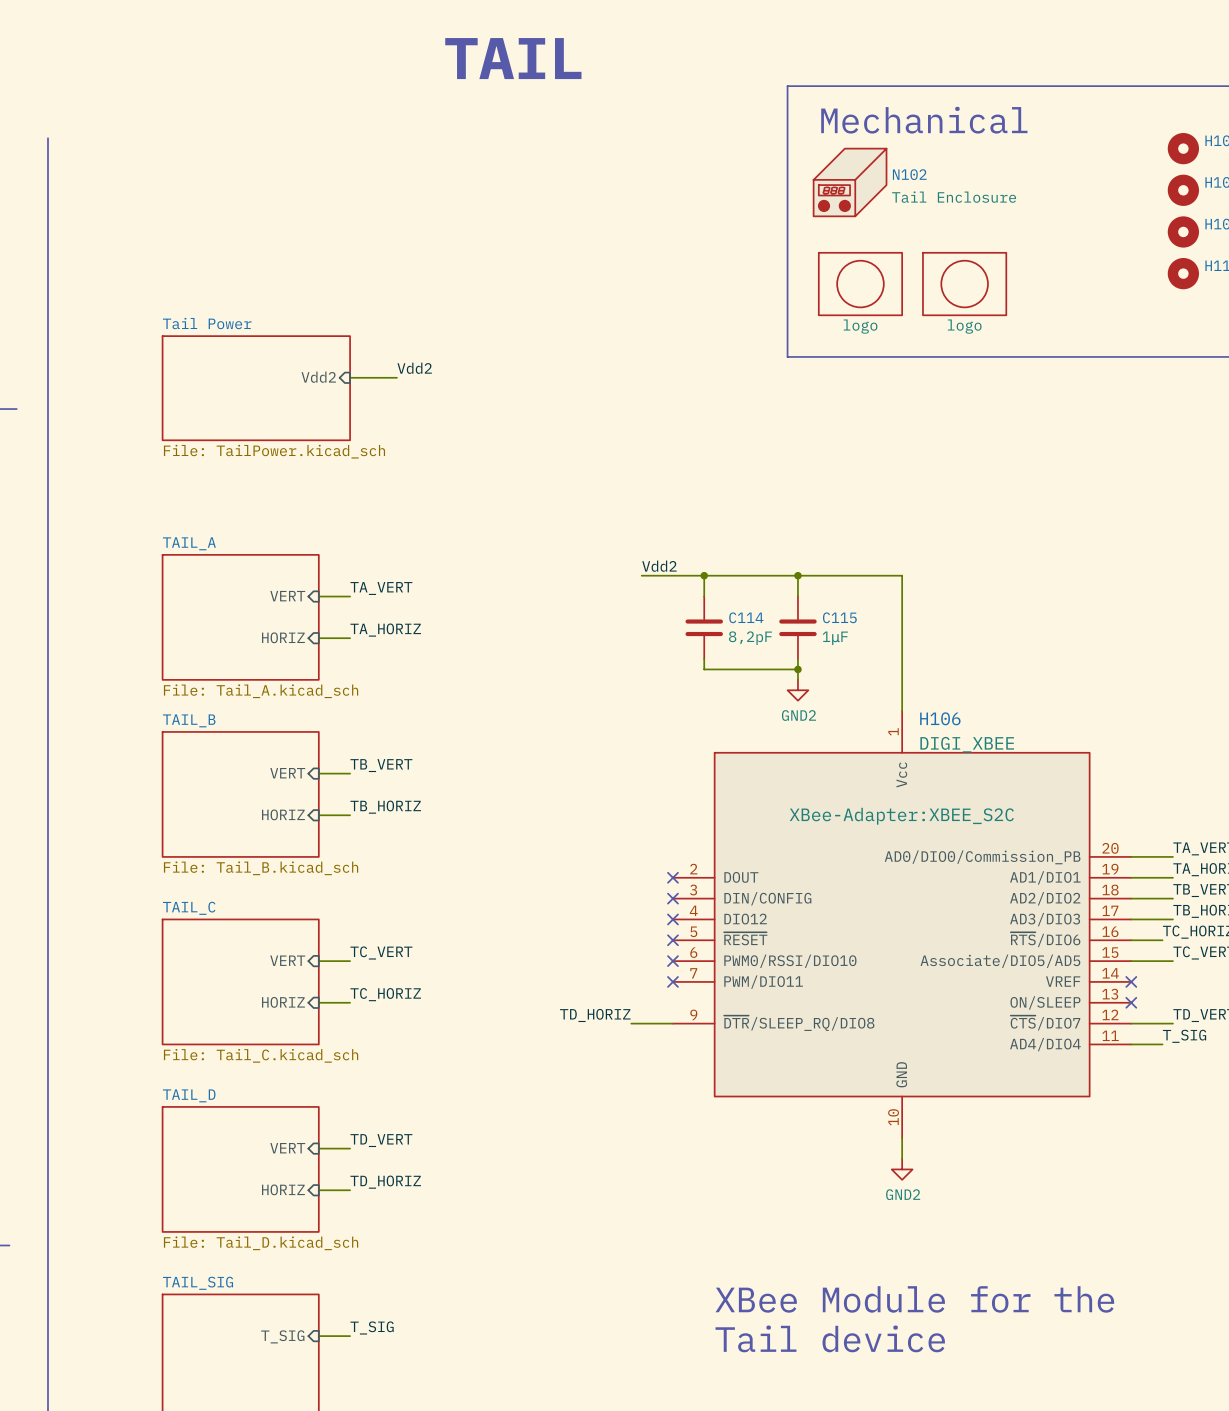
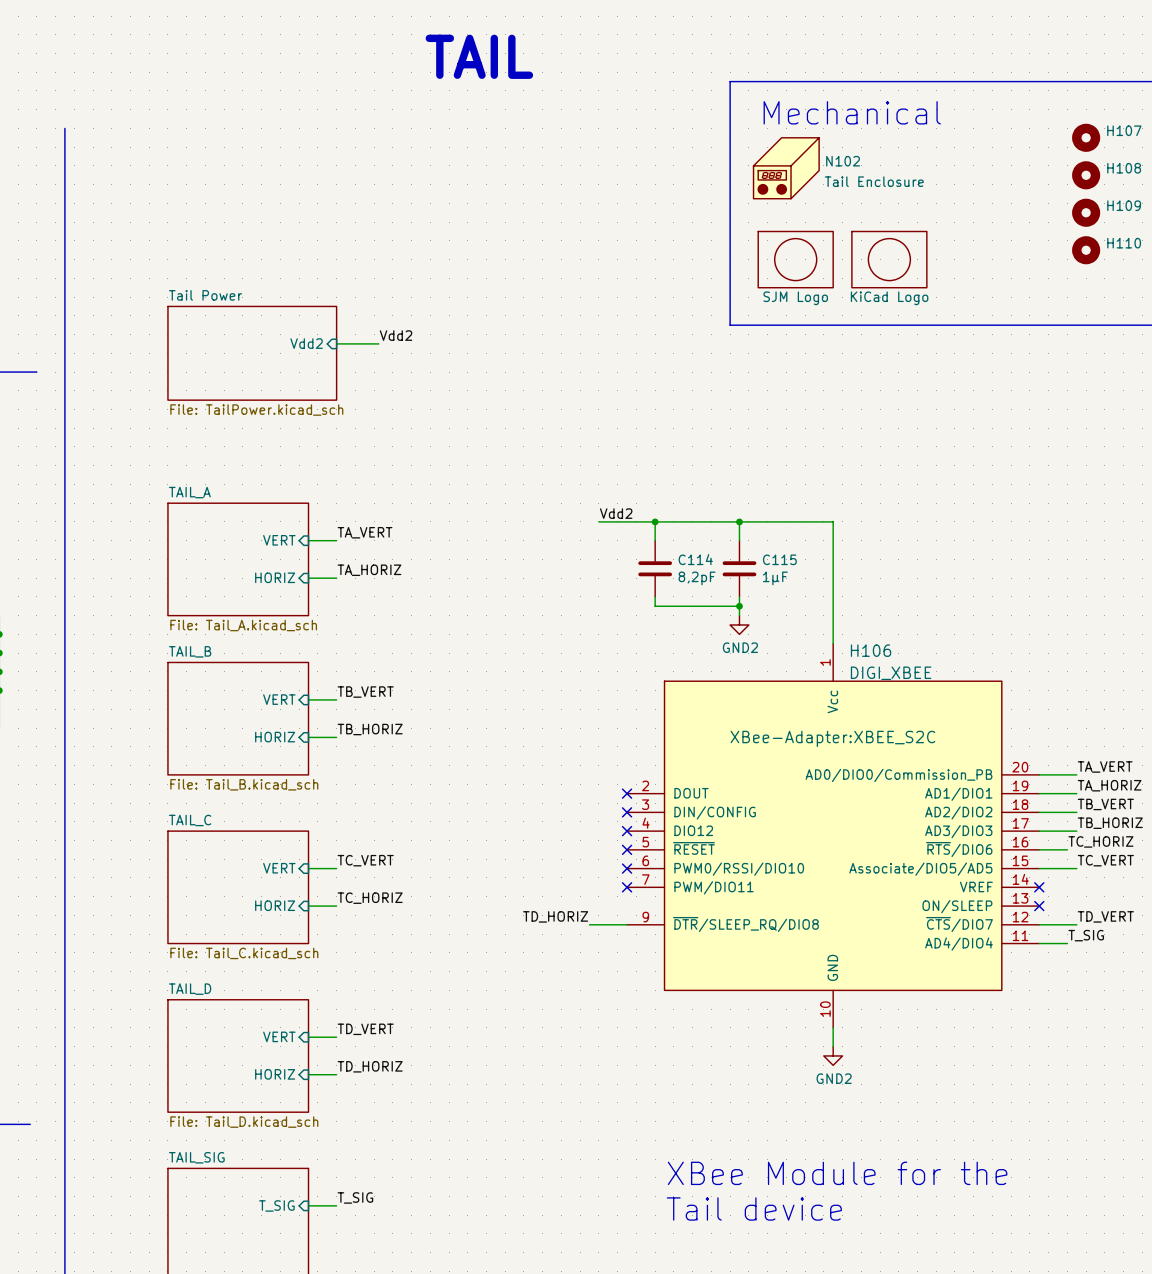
part value: logo (860, 326) -> SJM Logo (795, 298)
part value: logo (964, 326) -> KiCad Logo (889, 298)

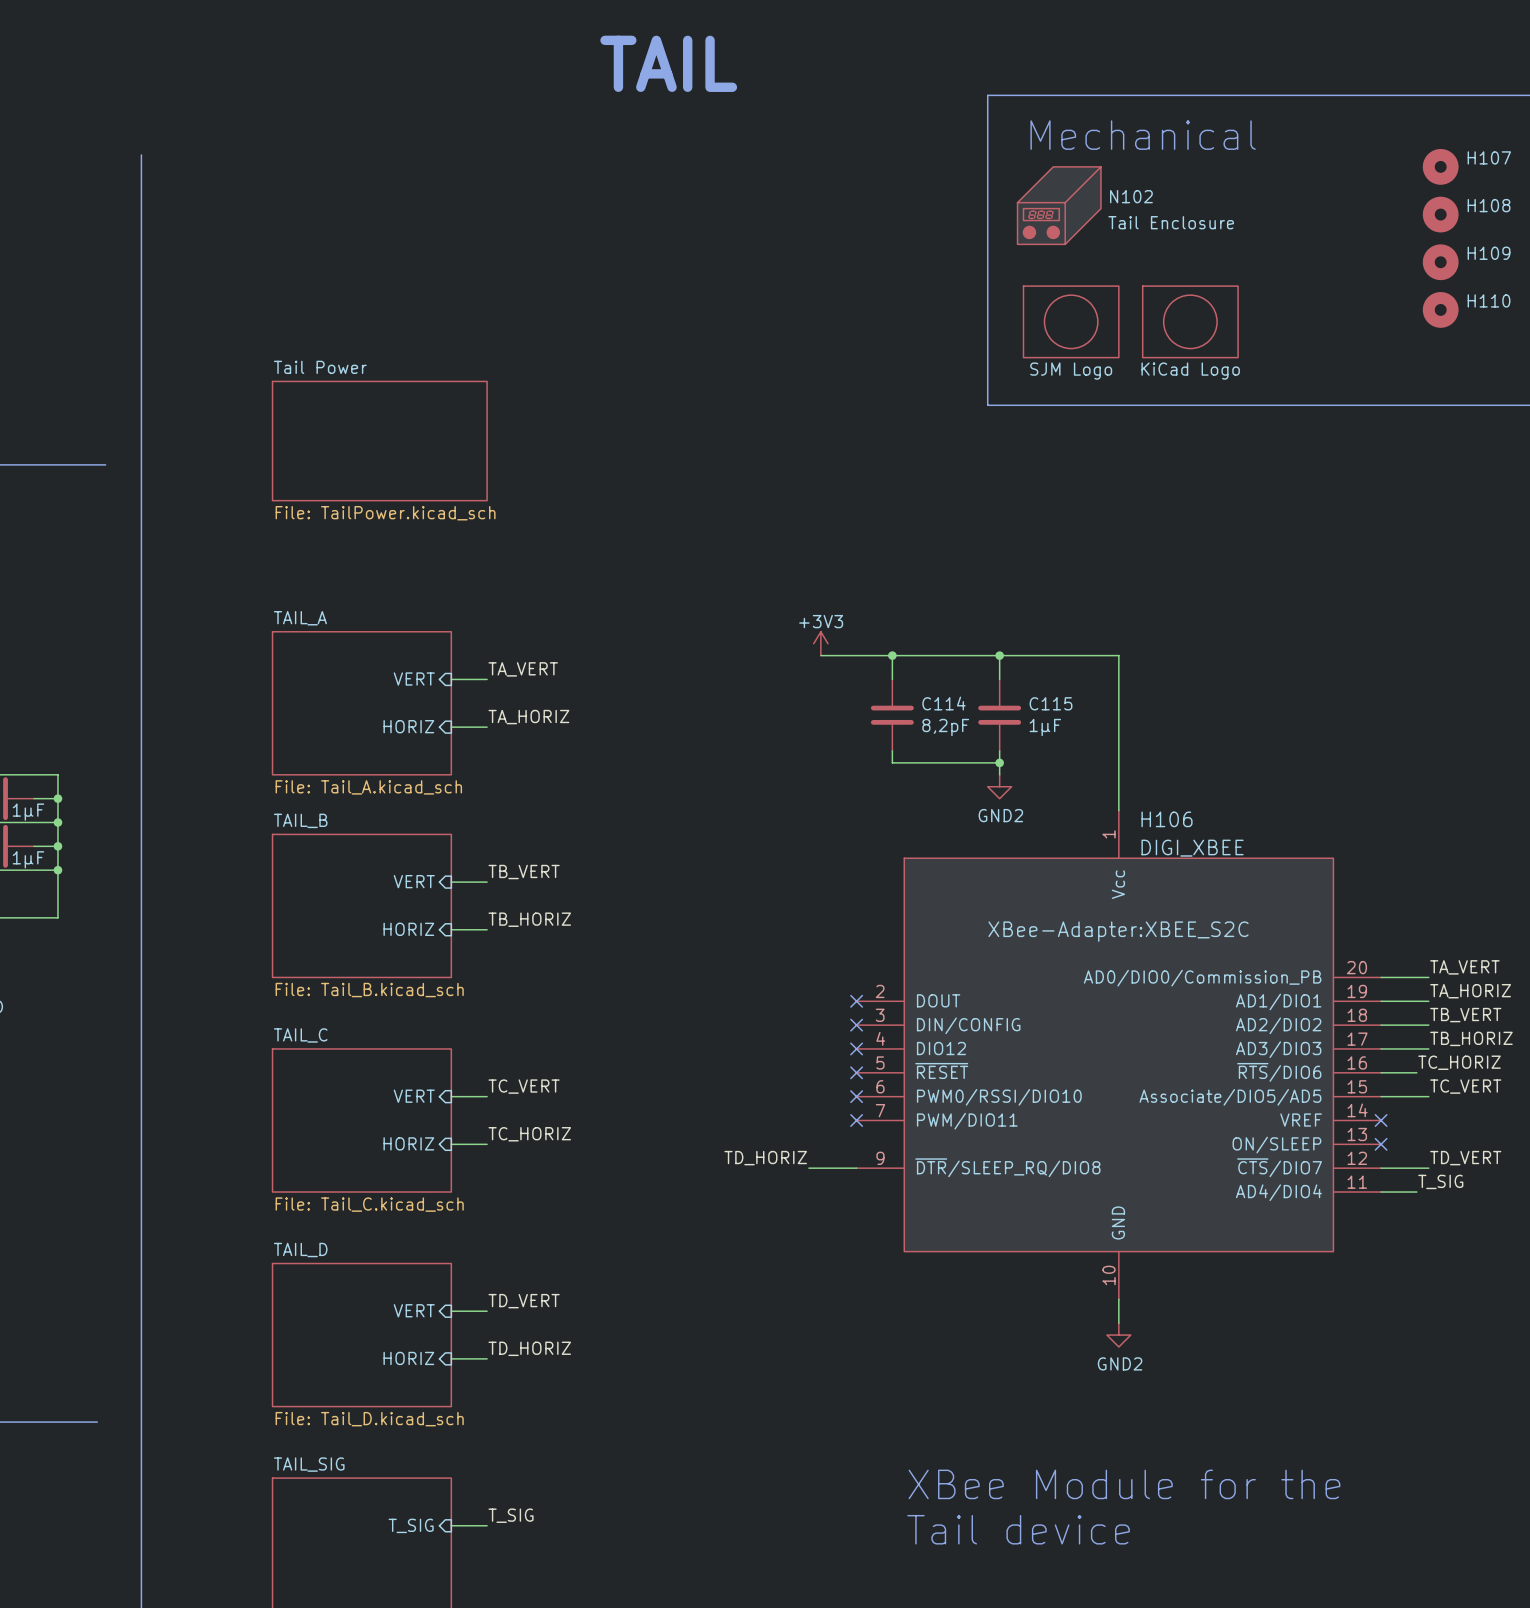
label: Vdd2 (396, 335) -> none
sheet pin: Vdd2 (306, 343) -> none
wire: (336, 343) (378, 343) -> none
power symbol: none -> +3V3 (820, 643)
label: Vdd2 (616, 513) -> none

